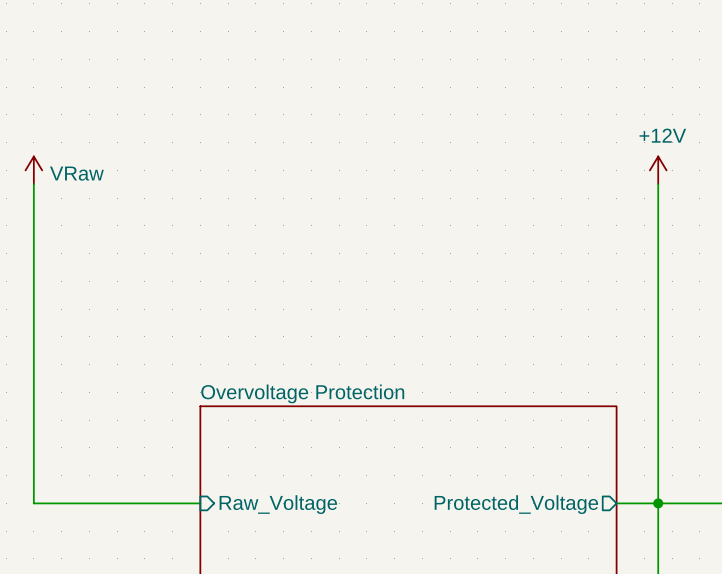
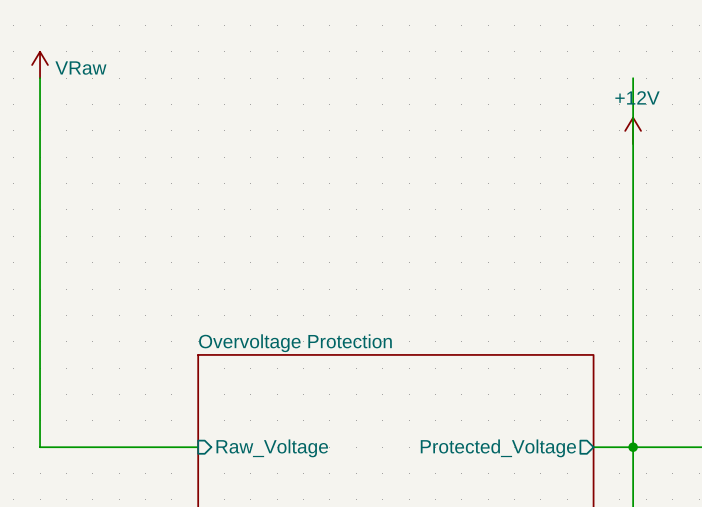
wire: none -> (40, 78) (40, 144)
wire: none -> (633, 78) (633, 144)
power symbol position: VRaw (33, 170) -> VRaw (40, 65)

